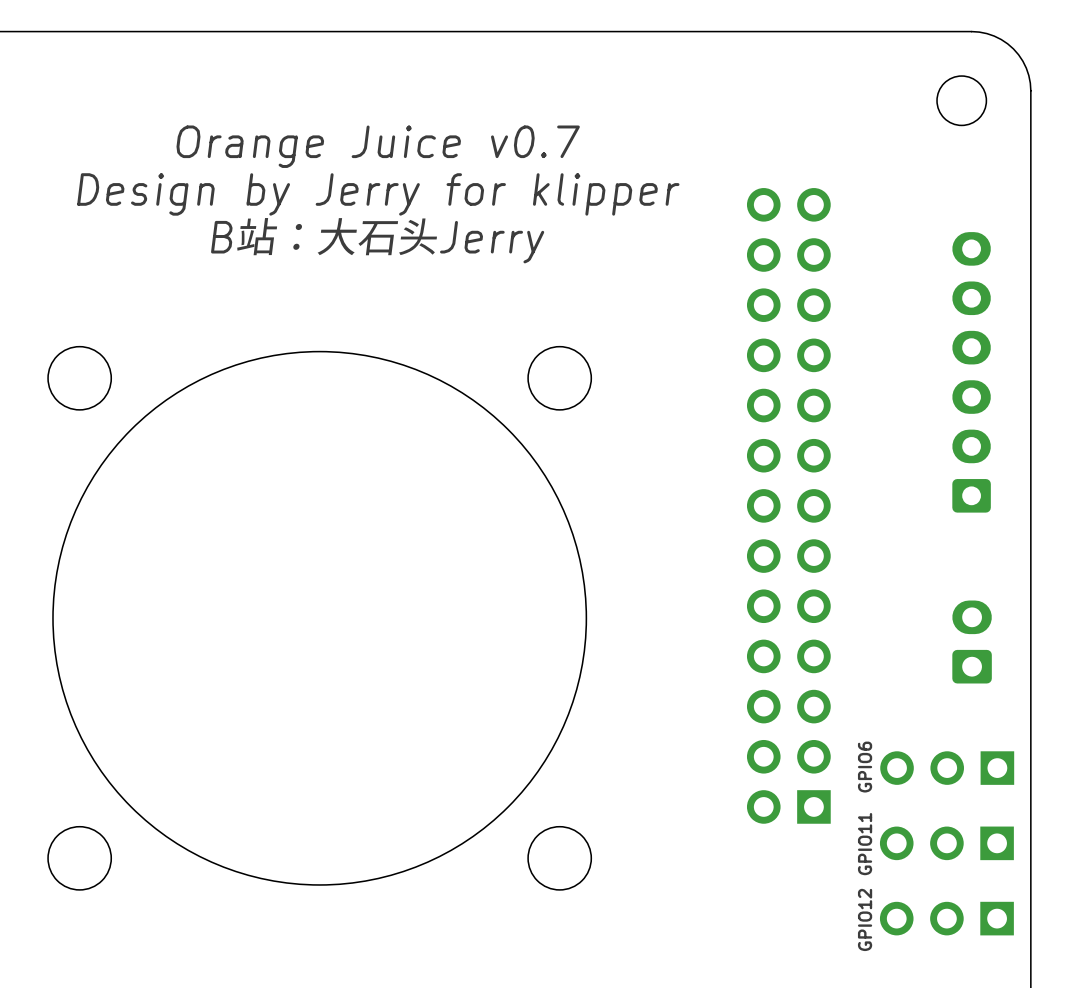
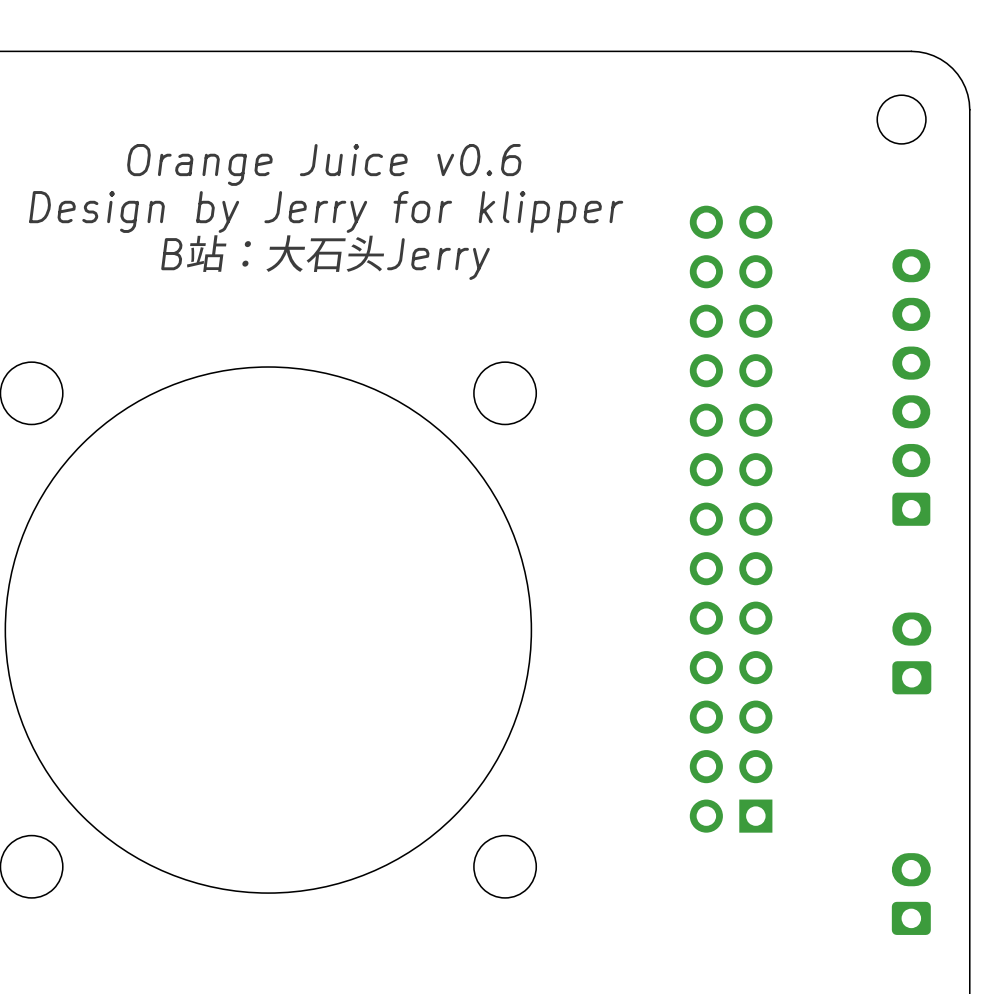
text: Orange Juice v0.7 (378, 146) -> Orange Juice v0.6 (324, 164)
text: GPIO6 (865, 767) -> none
part: (947, 768) -> none
part: (946, 843) -> none
text: GPIO11 (865, 844) -> none
part: none -> (911, 894)
part: (946, 918) -> none
text: GPIO12 (865, 919) -> none

